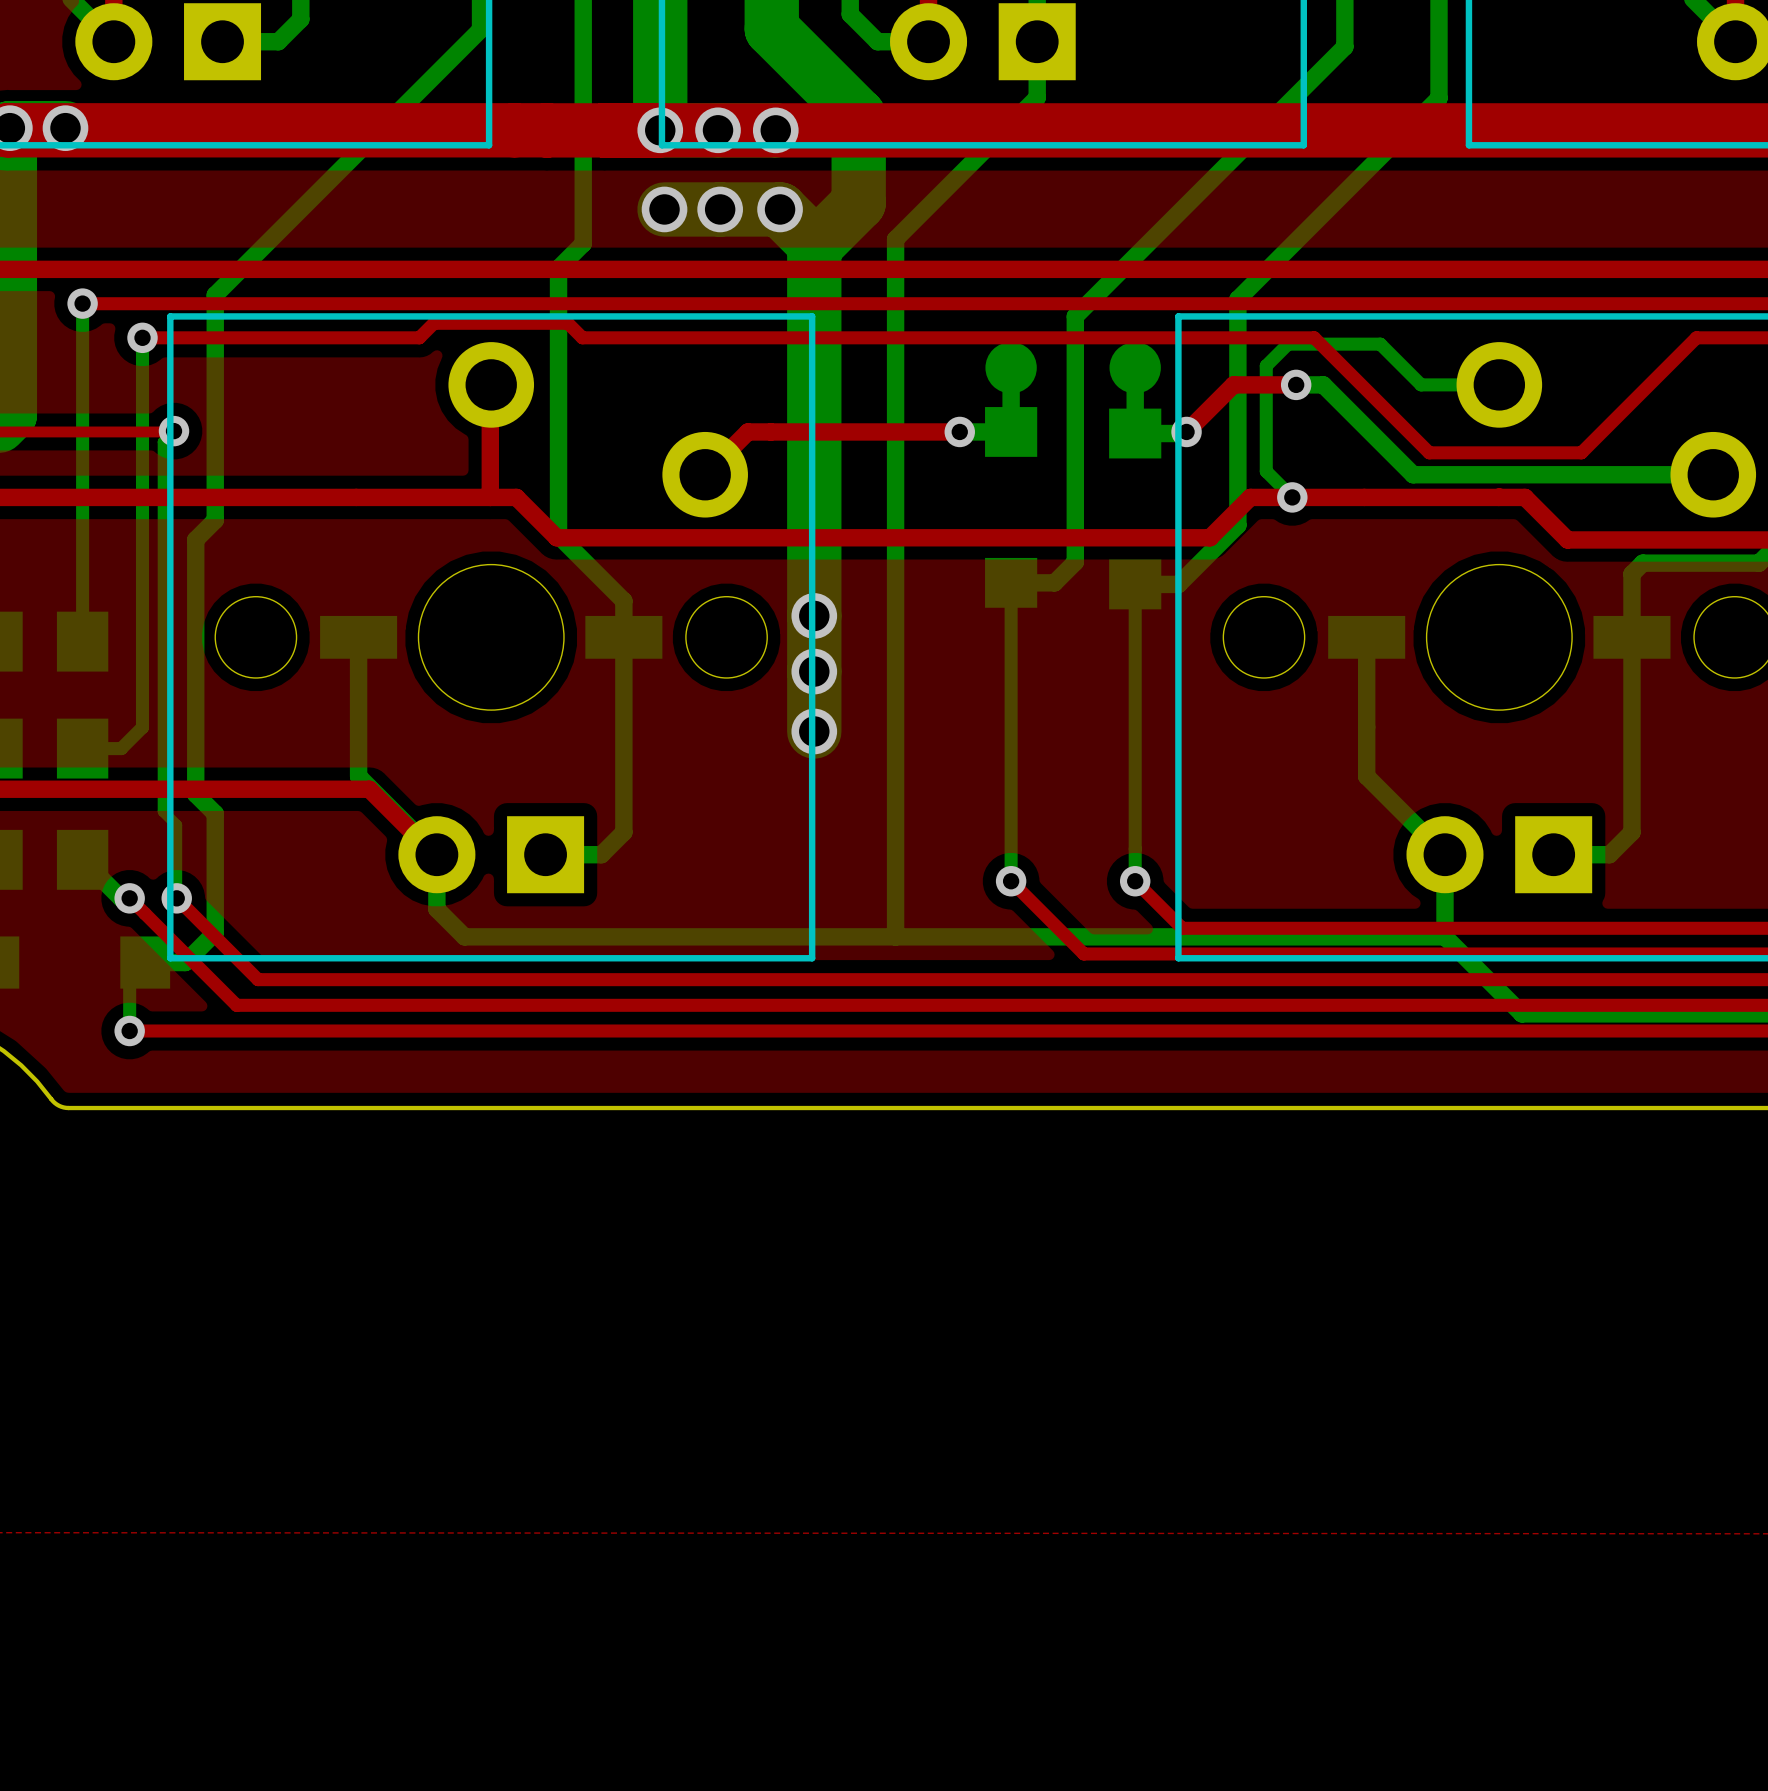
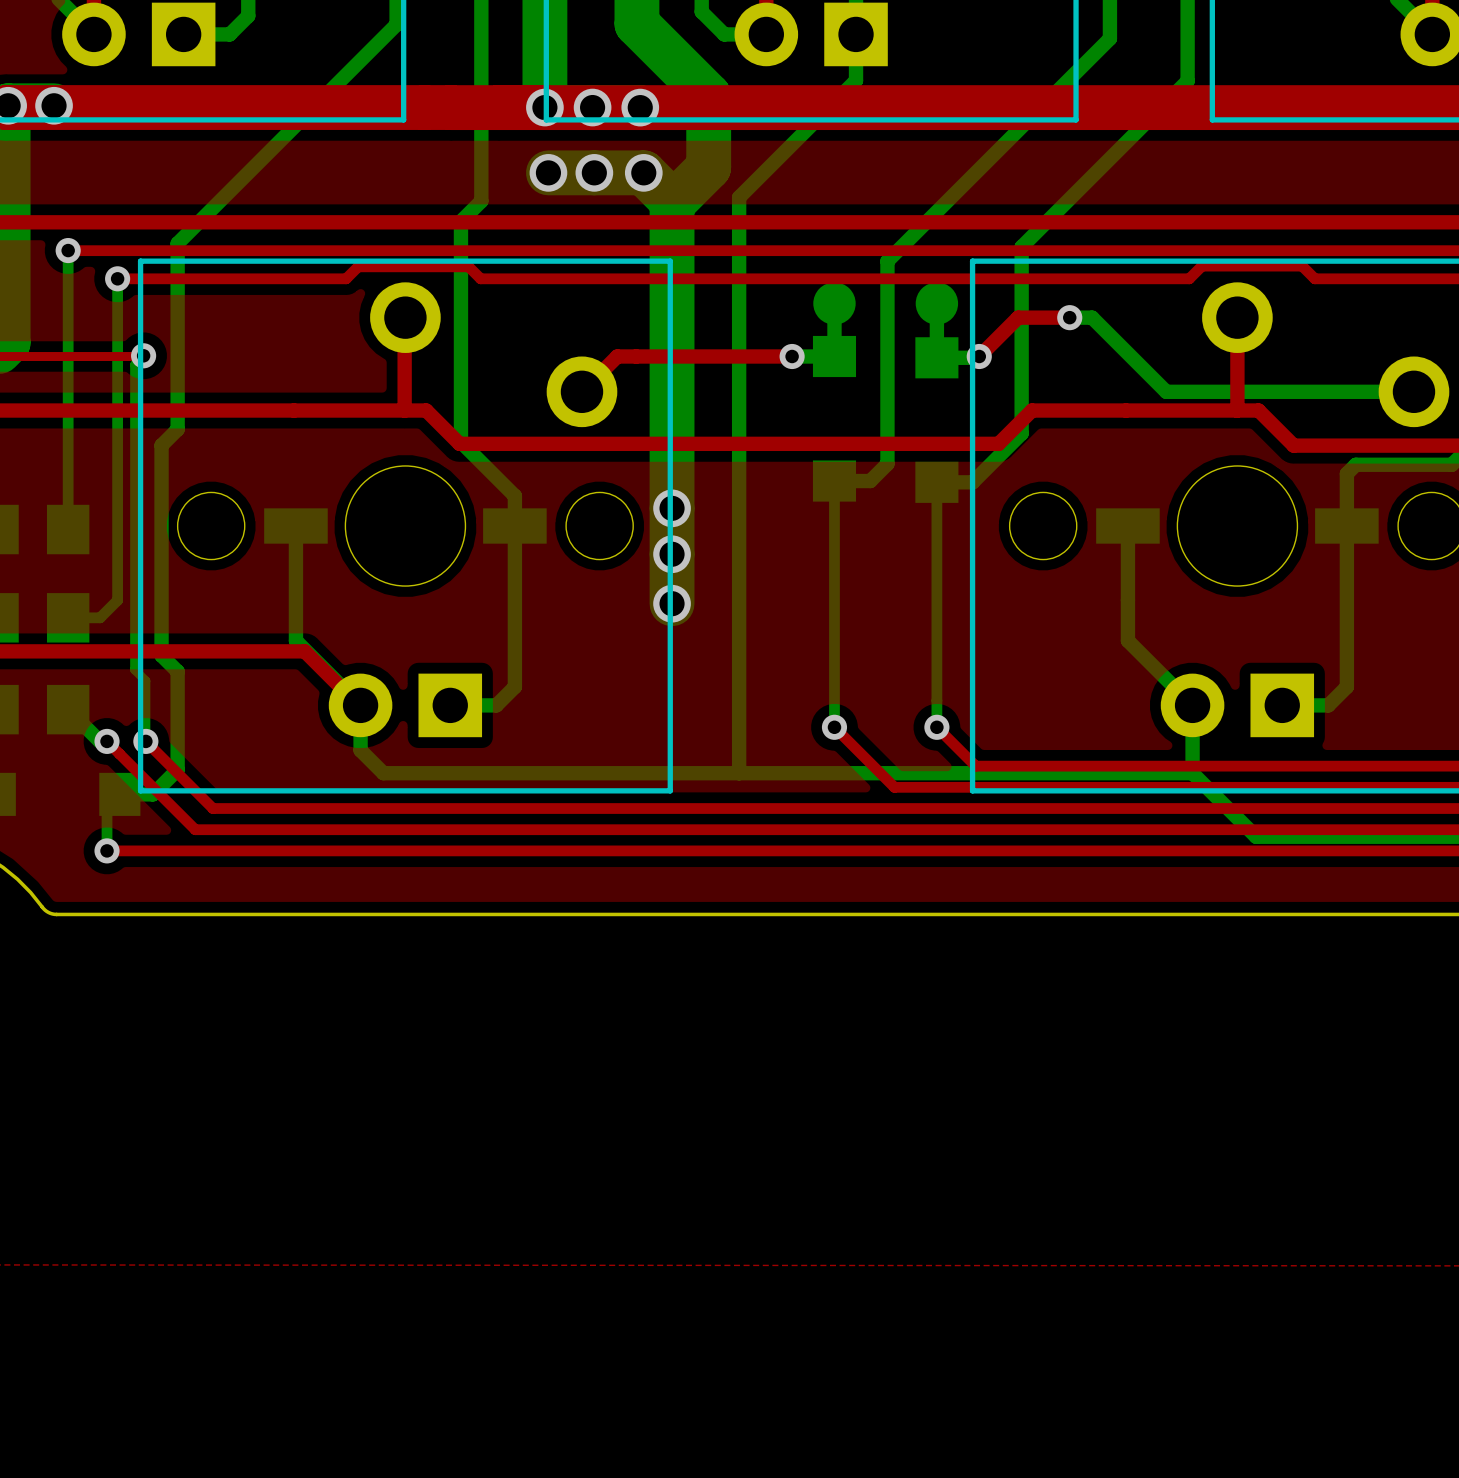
top track: (1314, 337) (1429, 452) (1581, 452) (1696, 337) -> (1084, 278) (1189, 278) (1202, 266) (1302, 266) (1314, 278) (1400, 278)
bottom track: (1499, 384) (1421, 384) (1380, 344) (1288, 344) (1266, 365) (1266, 471) (1292, 497) -> none
top track: none -> (1237, 317) (1237, 410)
via: (1292, 497) -> none

